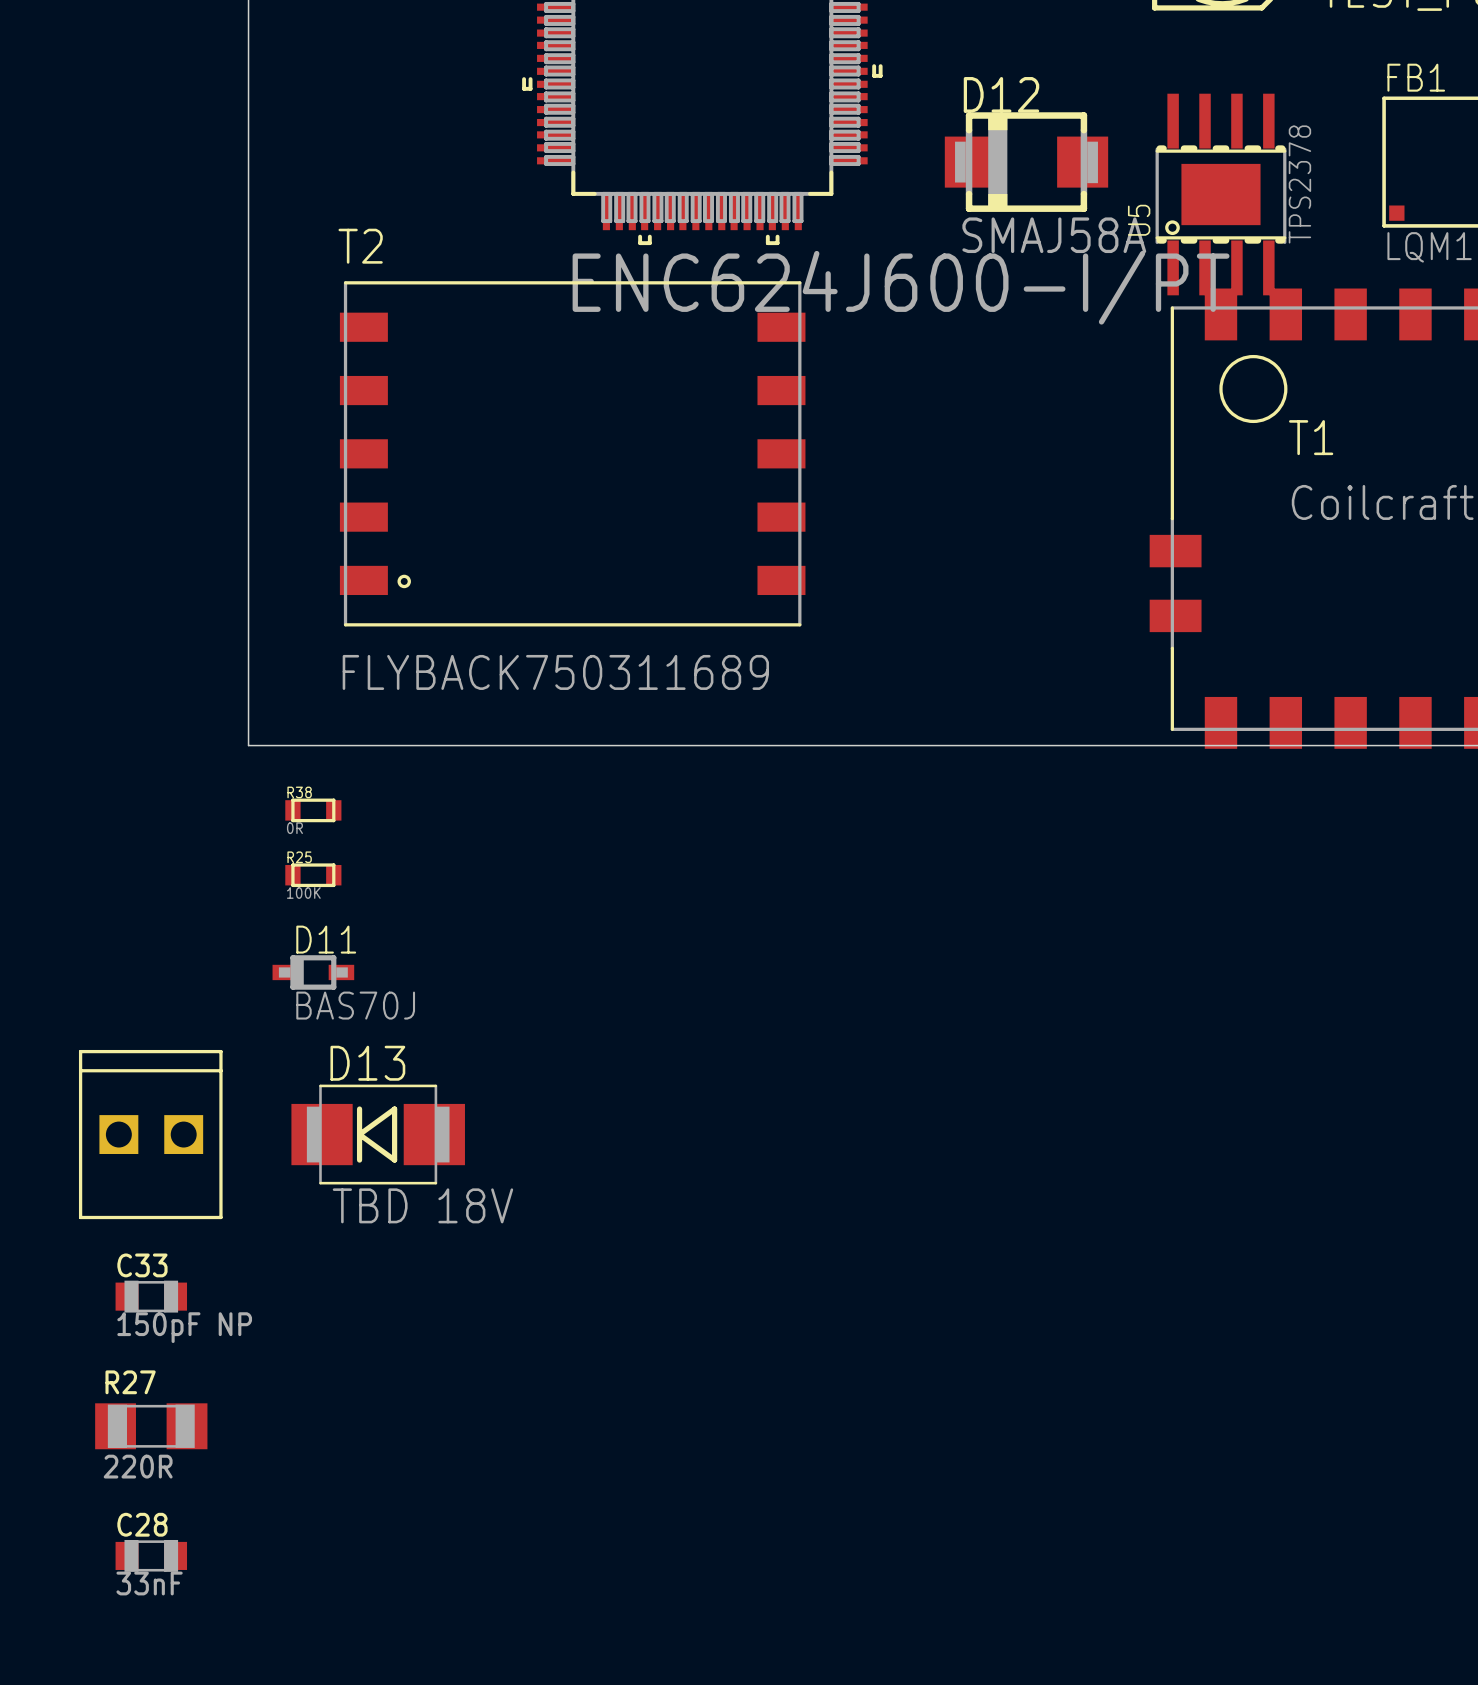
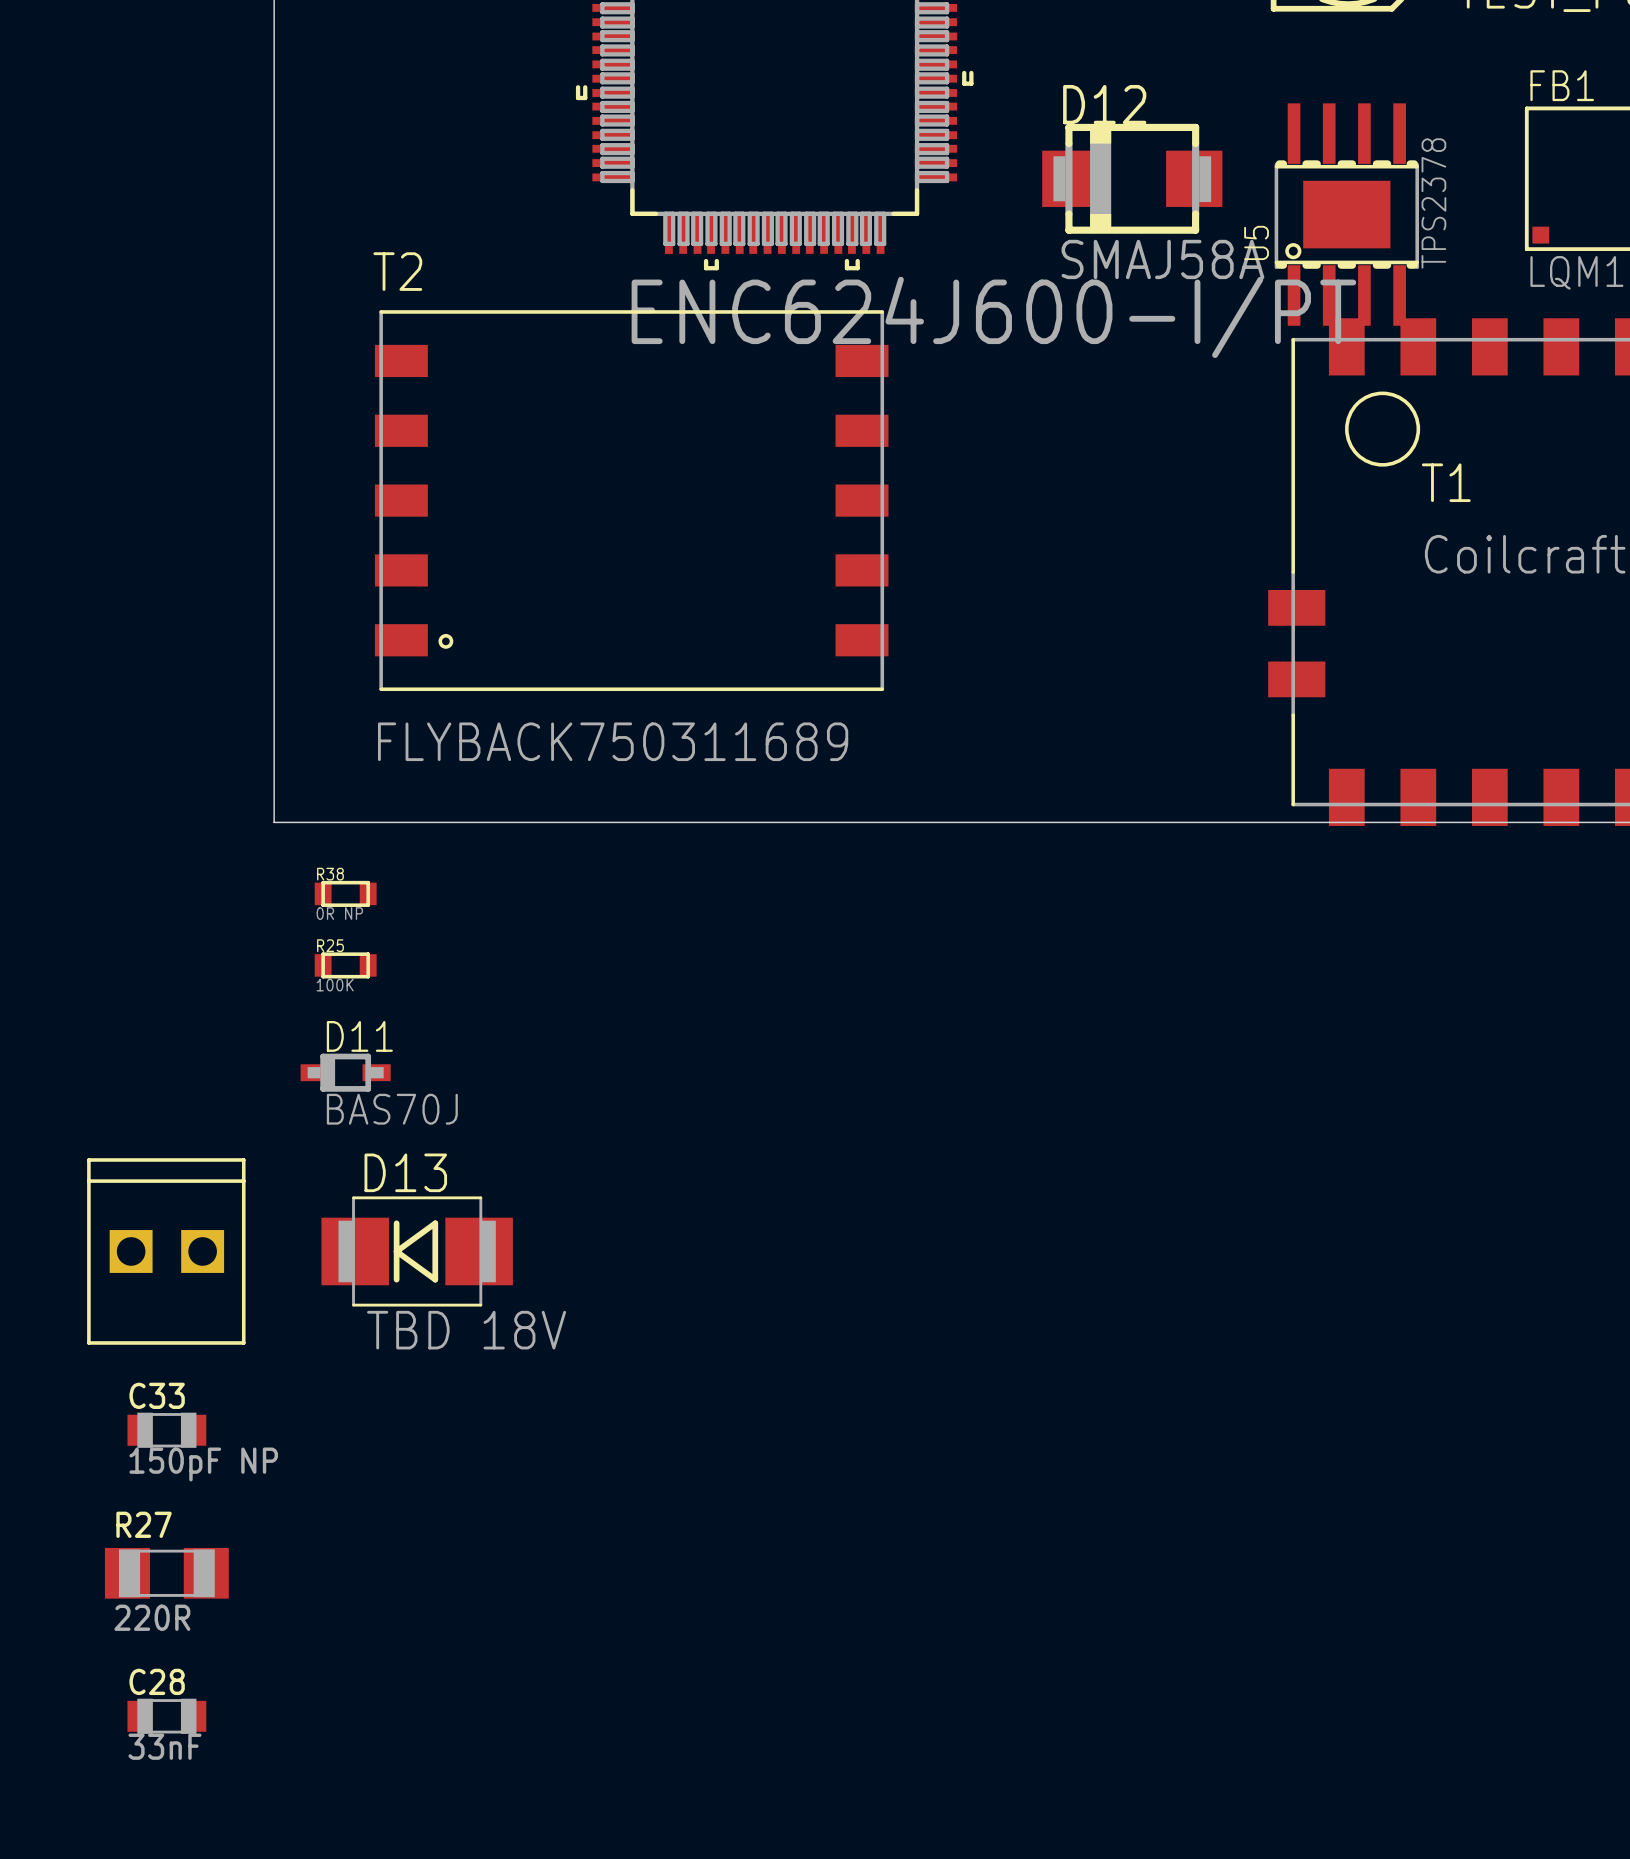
R38 value: 0R (294, 828) -> 0R NP (339, 913)

